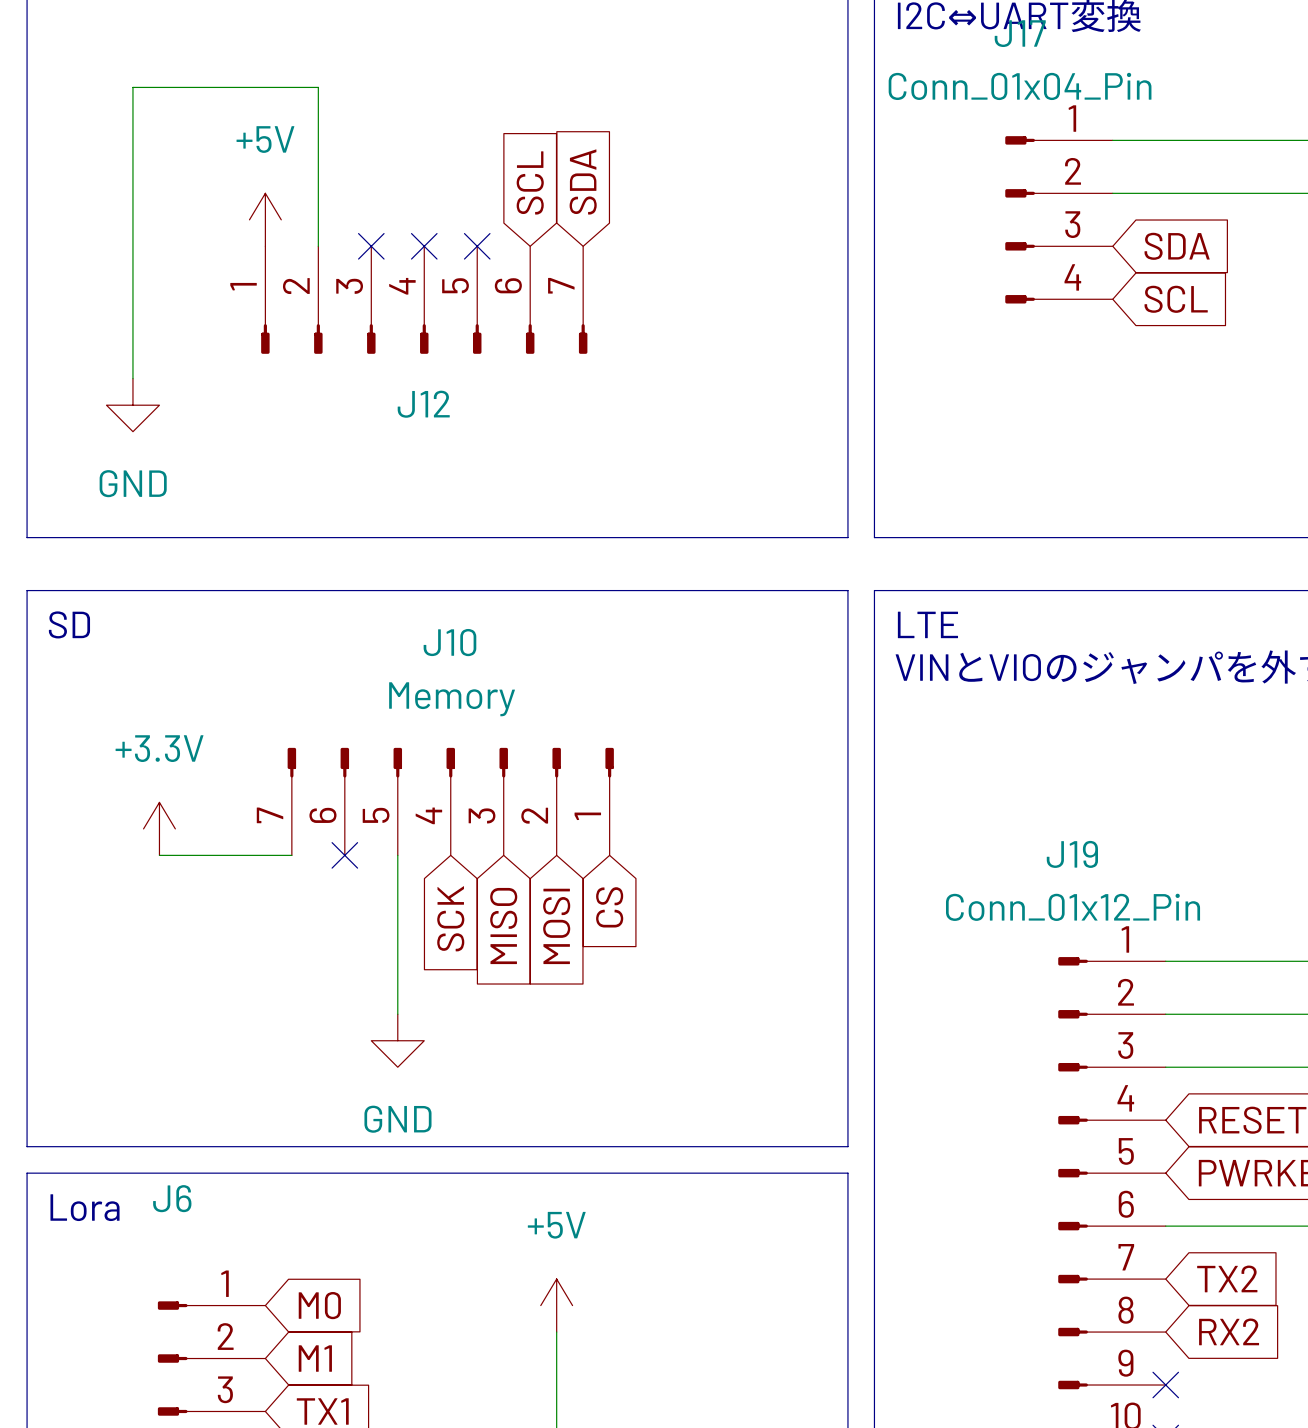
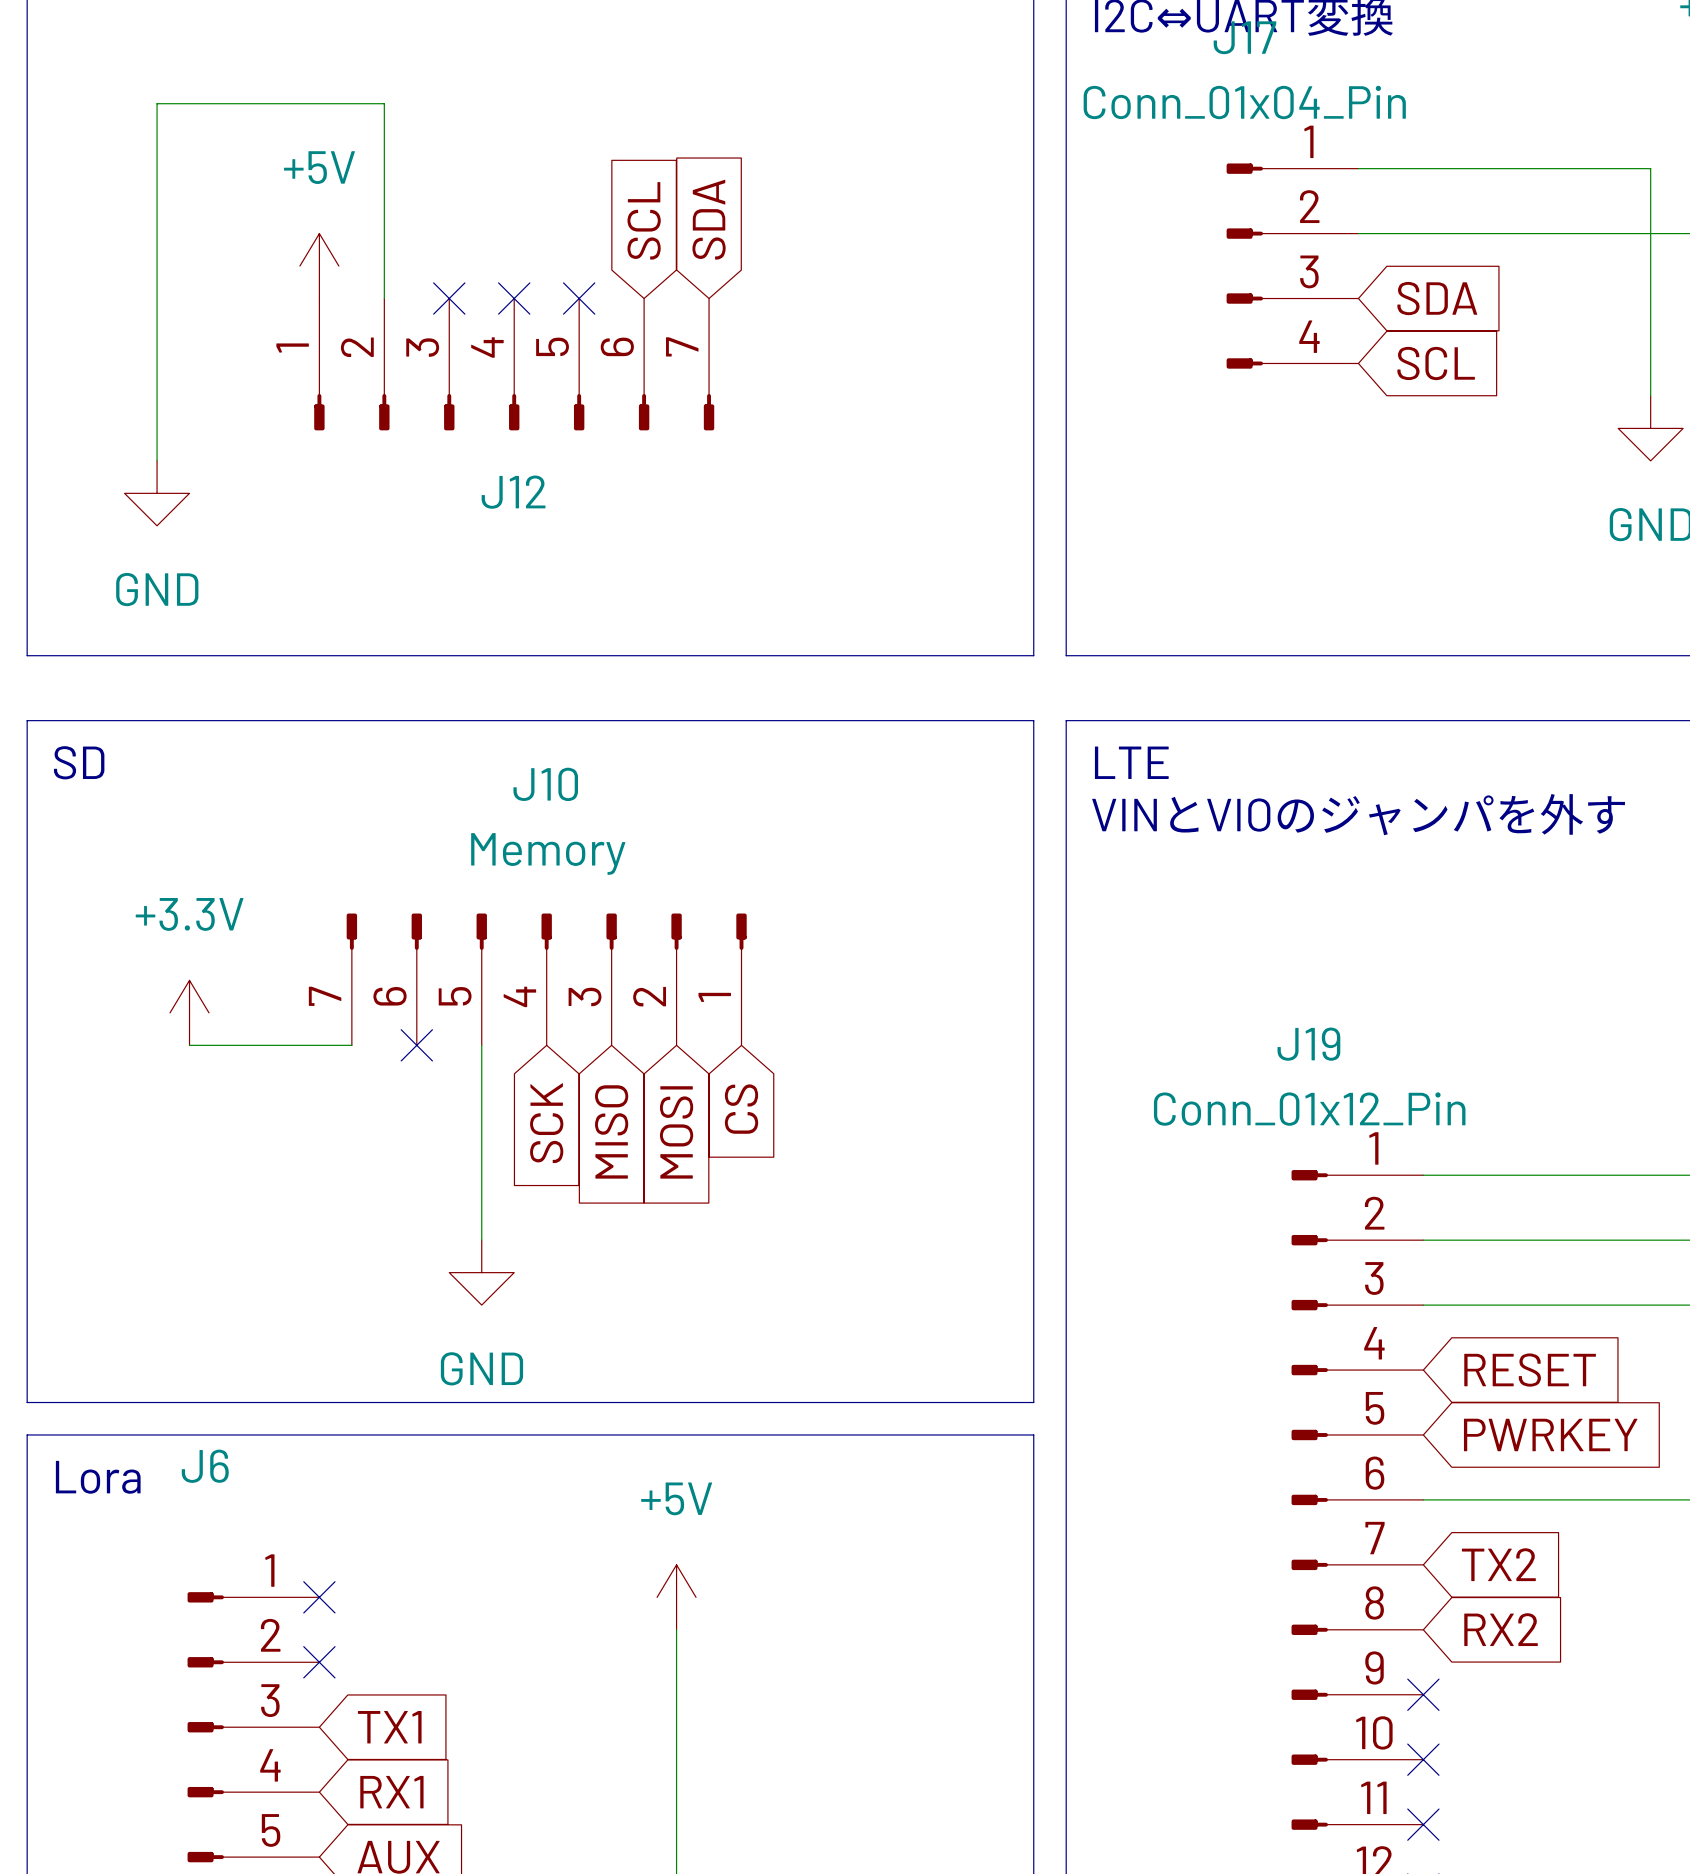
no-connect mark: none -> (319, 1597)
global label: M0 (319, 1305) -> none
no-connect mark: none -> (319, 1662)
global label: M1 (315, 1358) -> none

